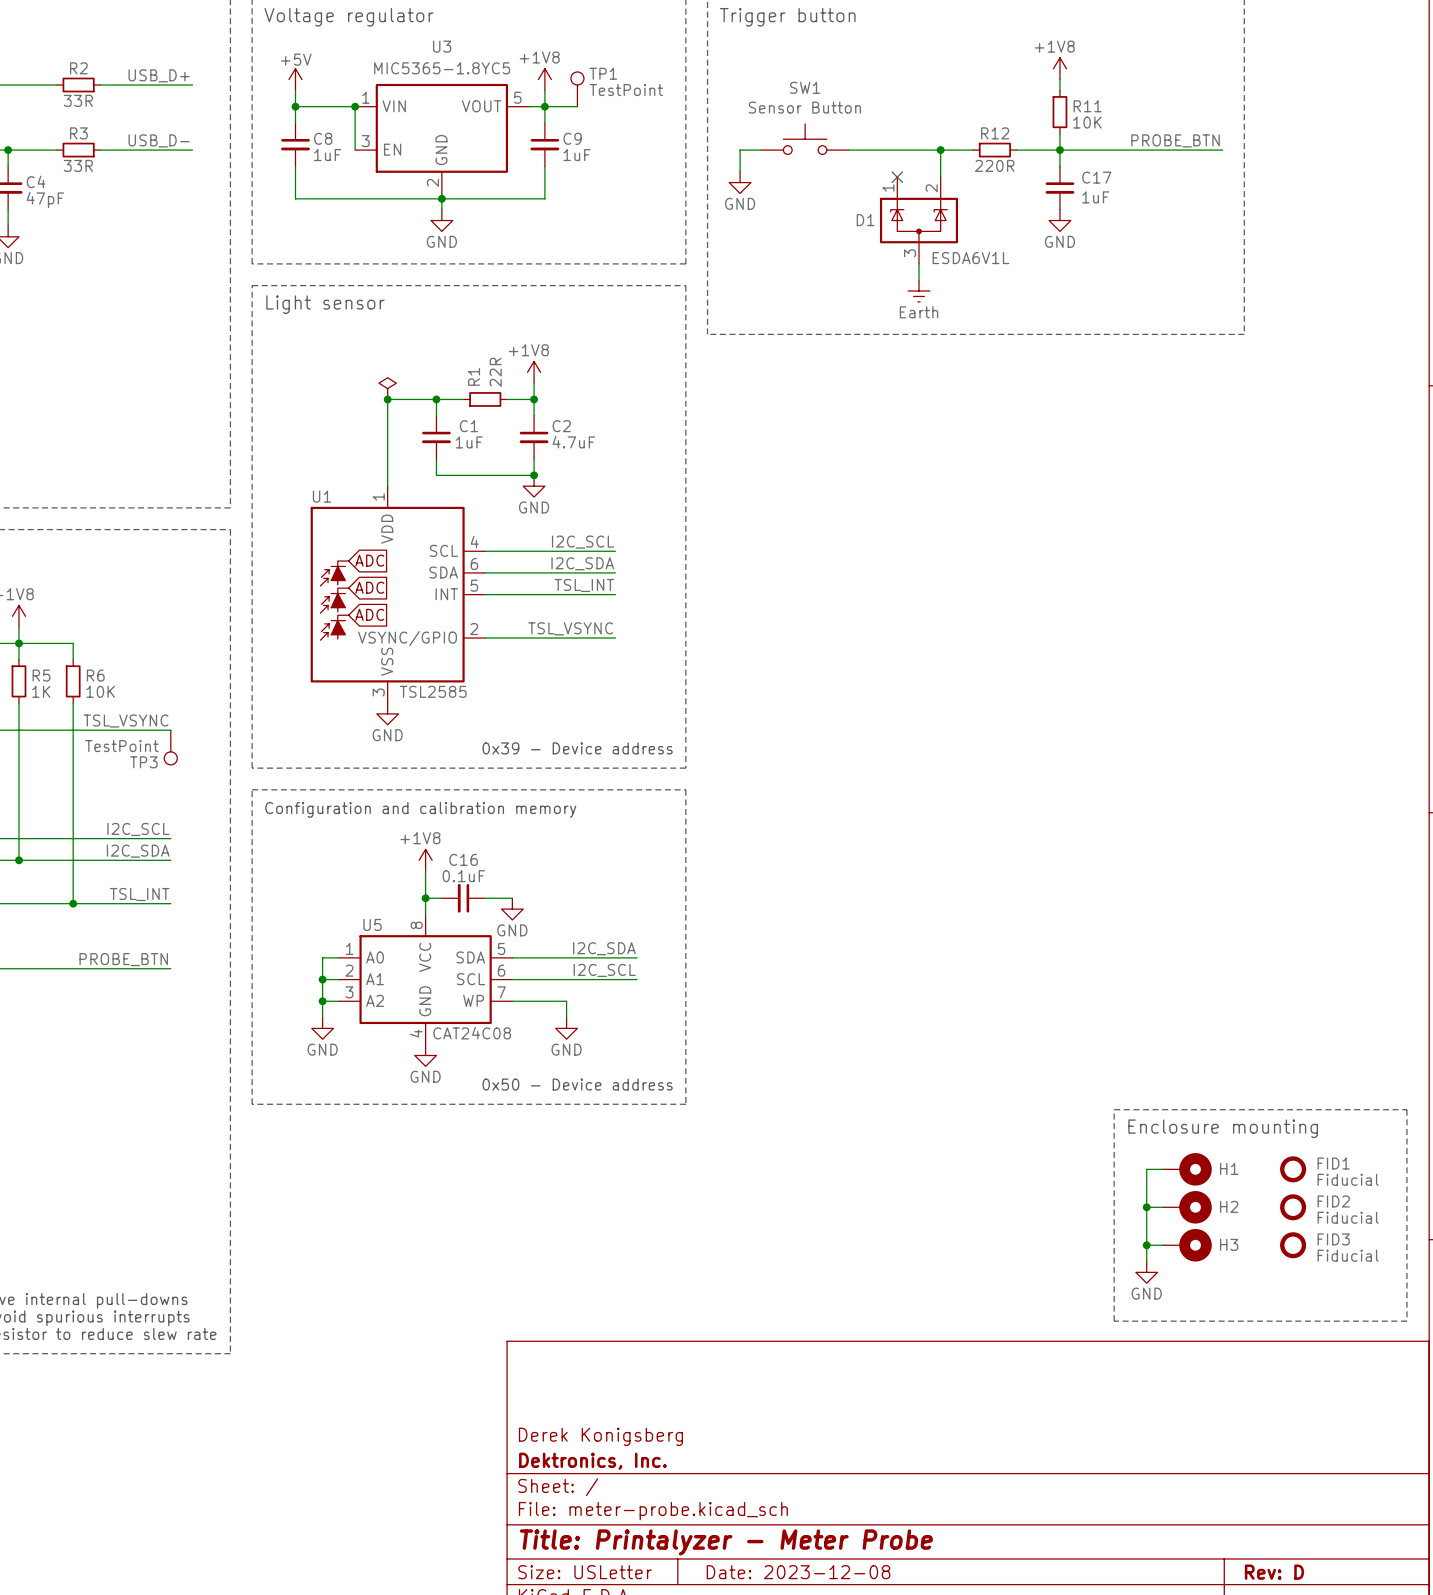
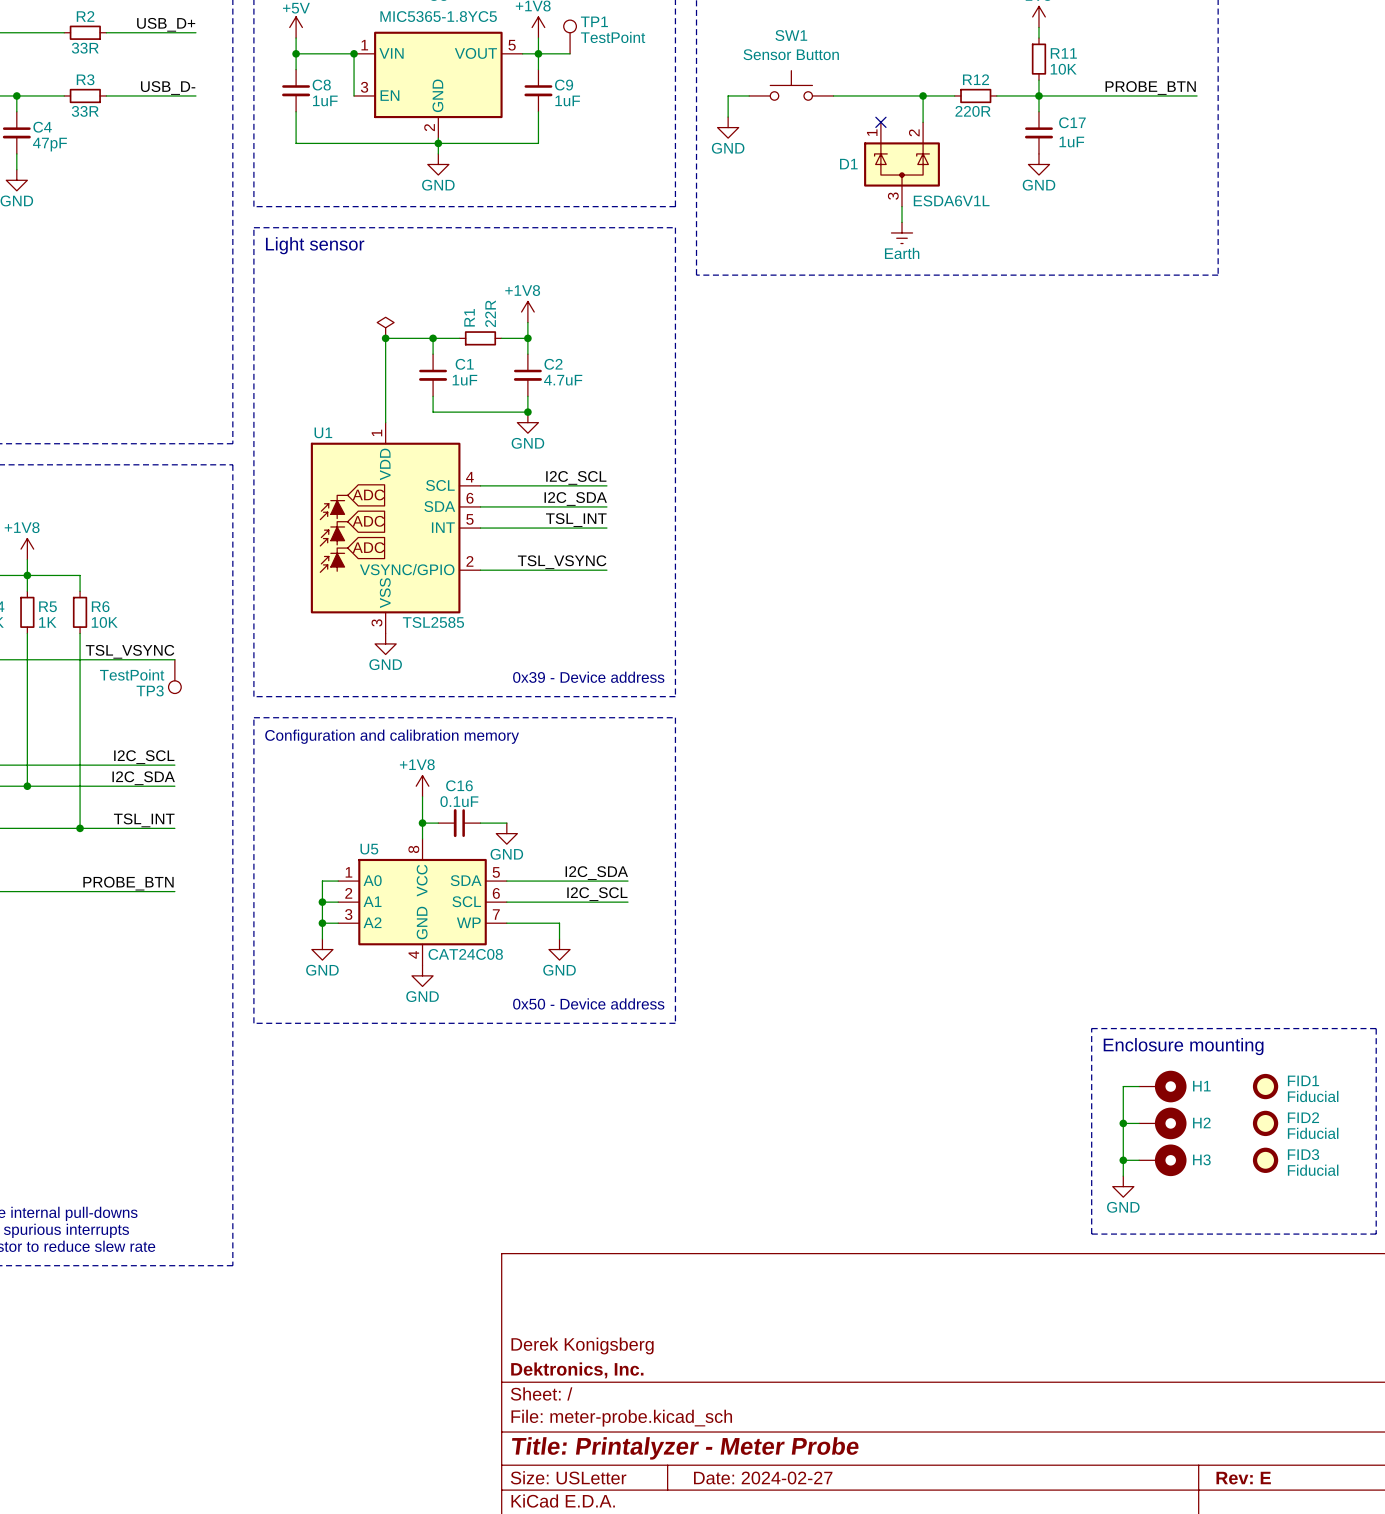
title block: Date: 2023-12-08 (798, 1572) -> Date: 2024-02-27 (763, 1478)
title block: Rev: D (1274, 1572) -> Rev: E (1243, 1478)

